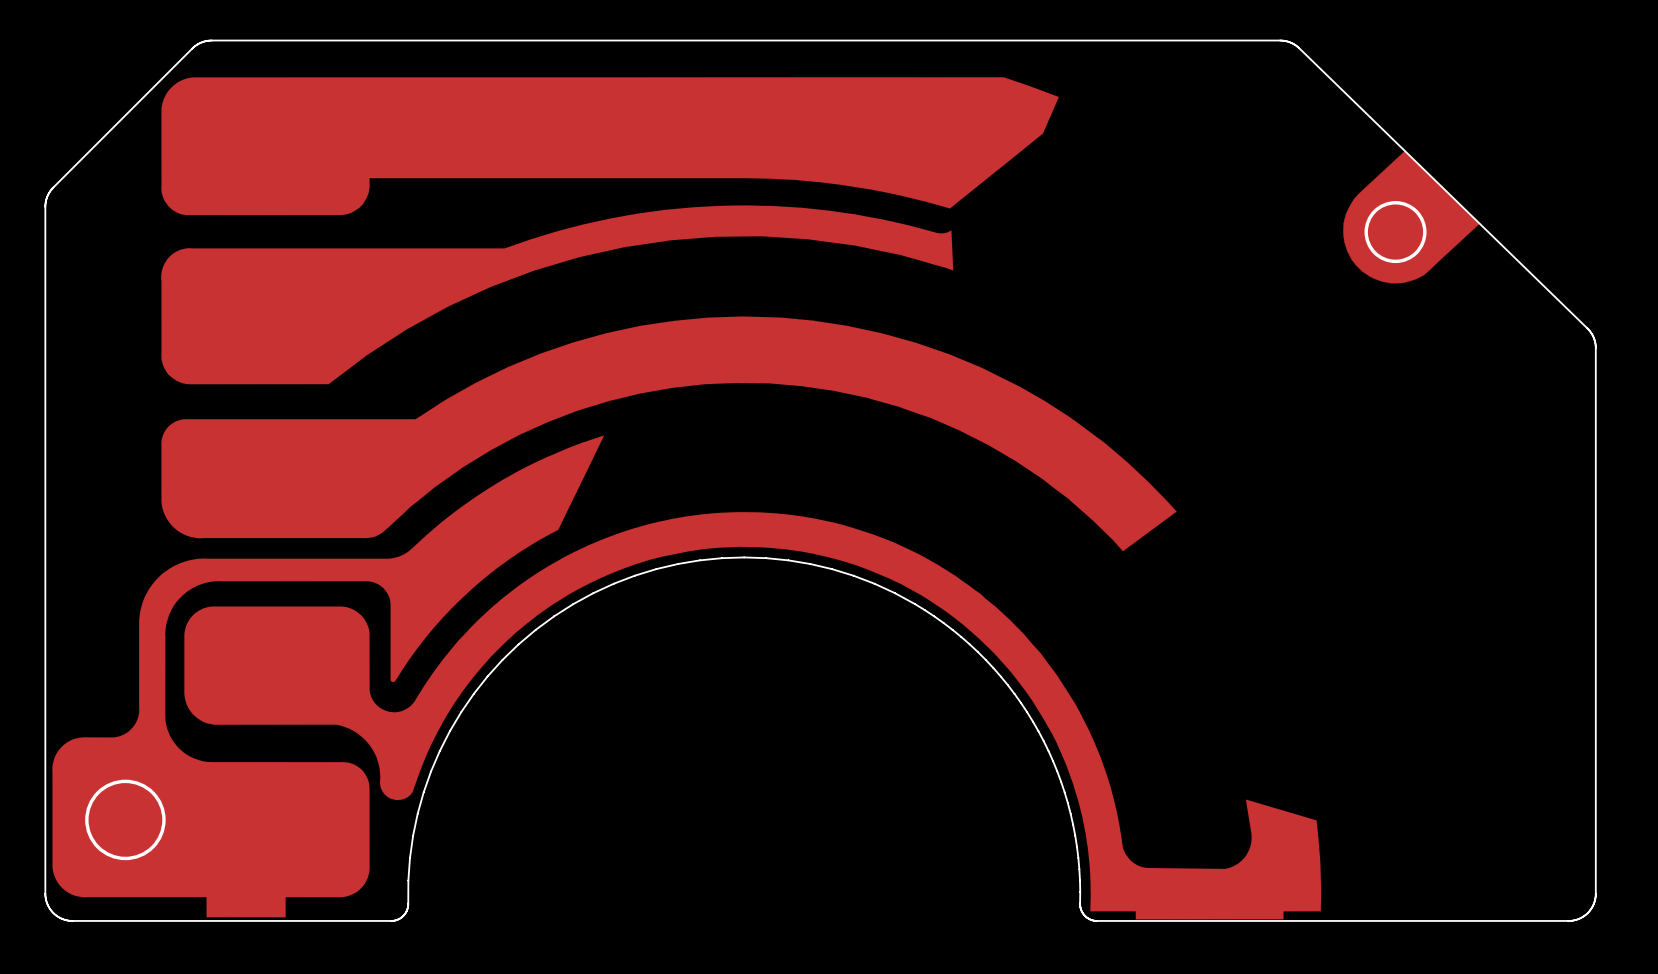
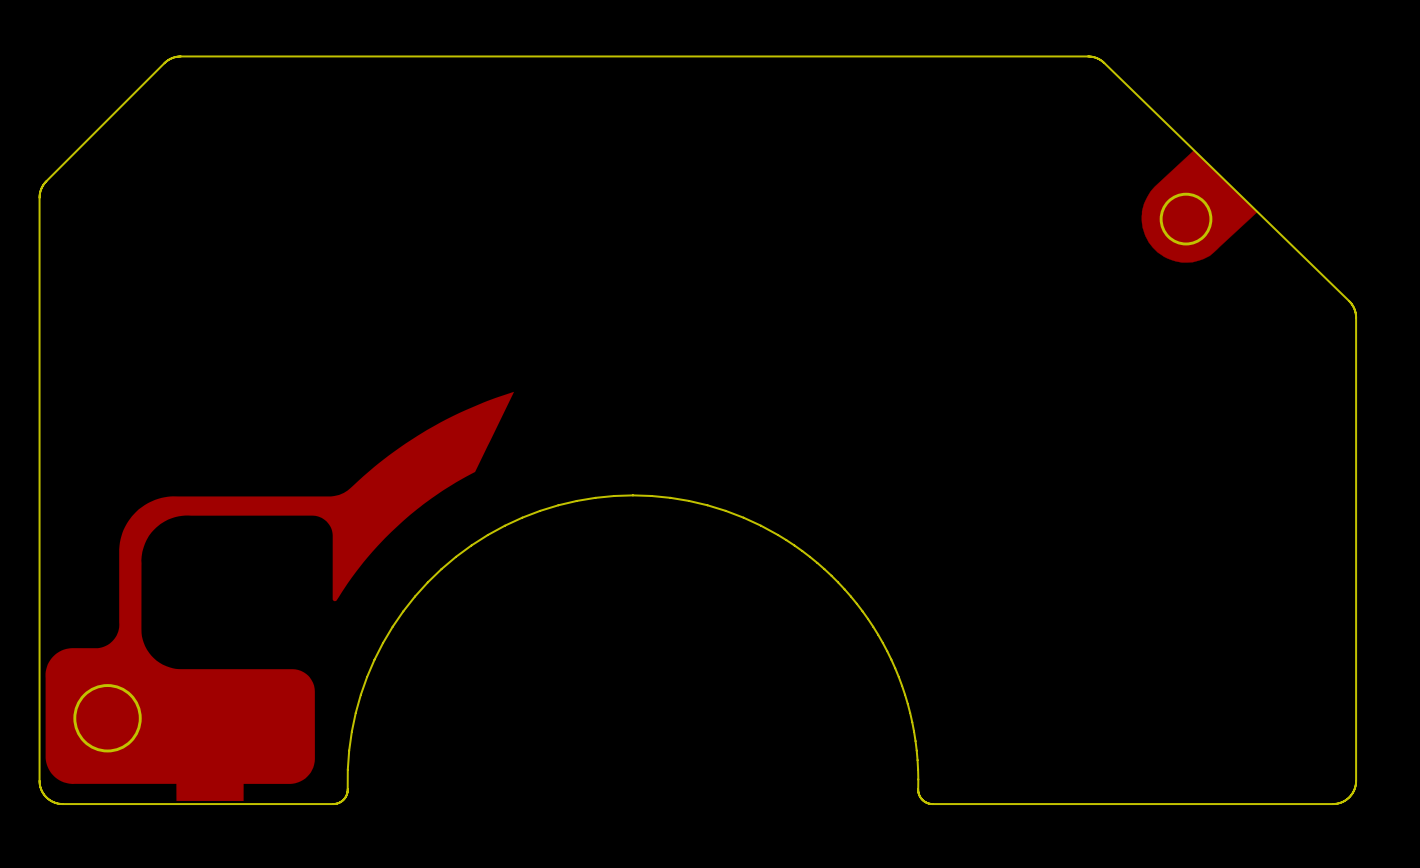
drawing: [161, 77, 1322, 920] -> none

